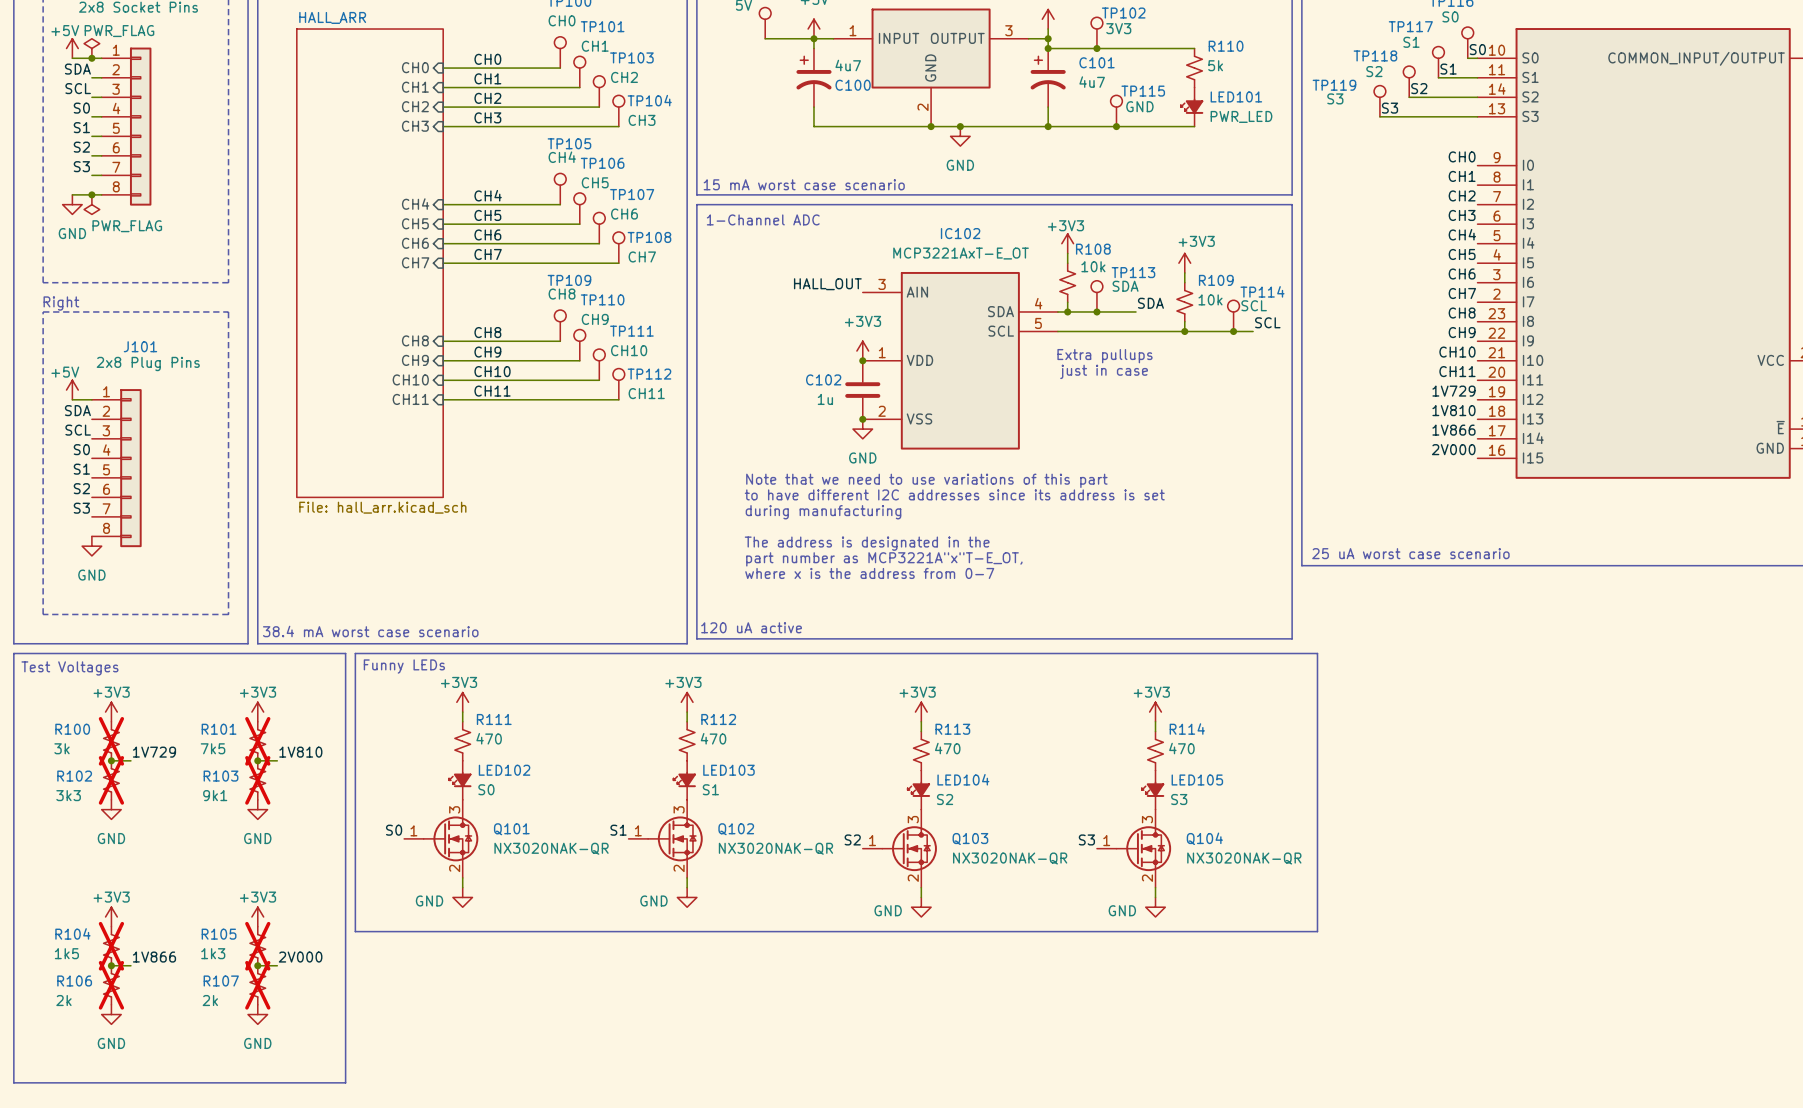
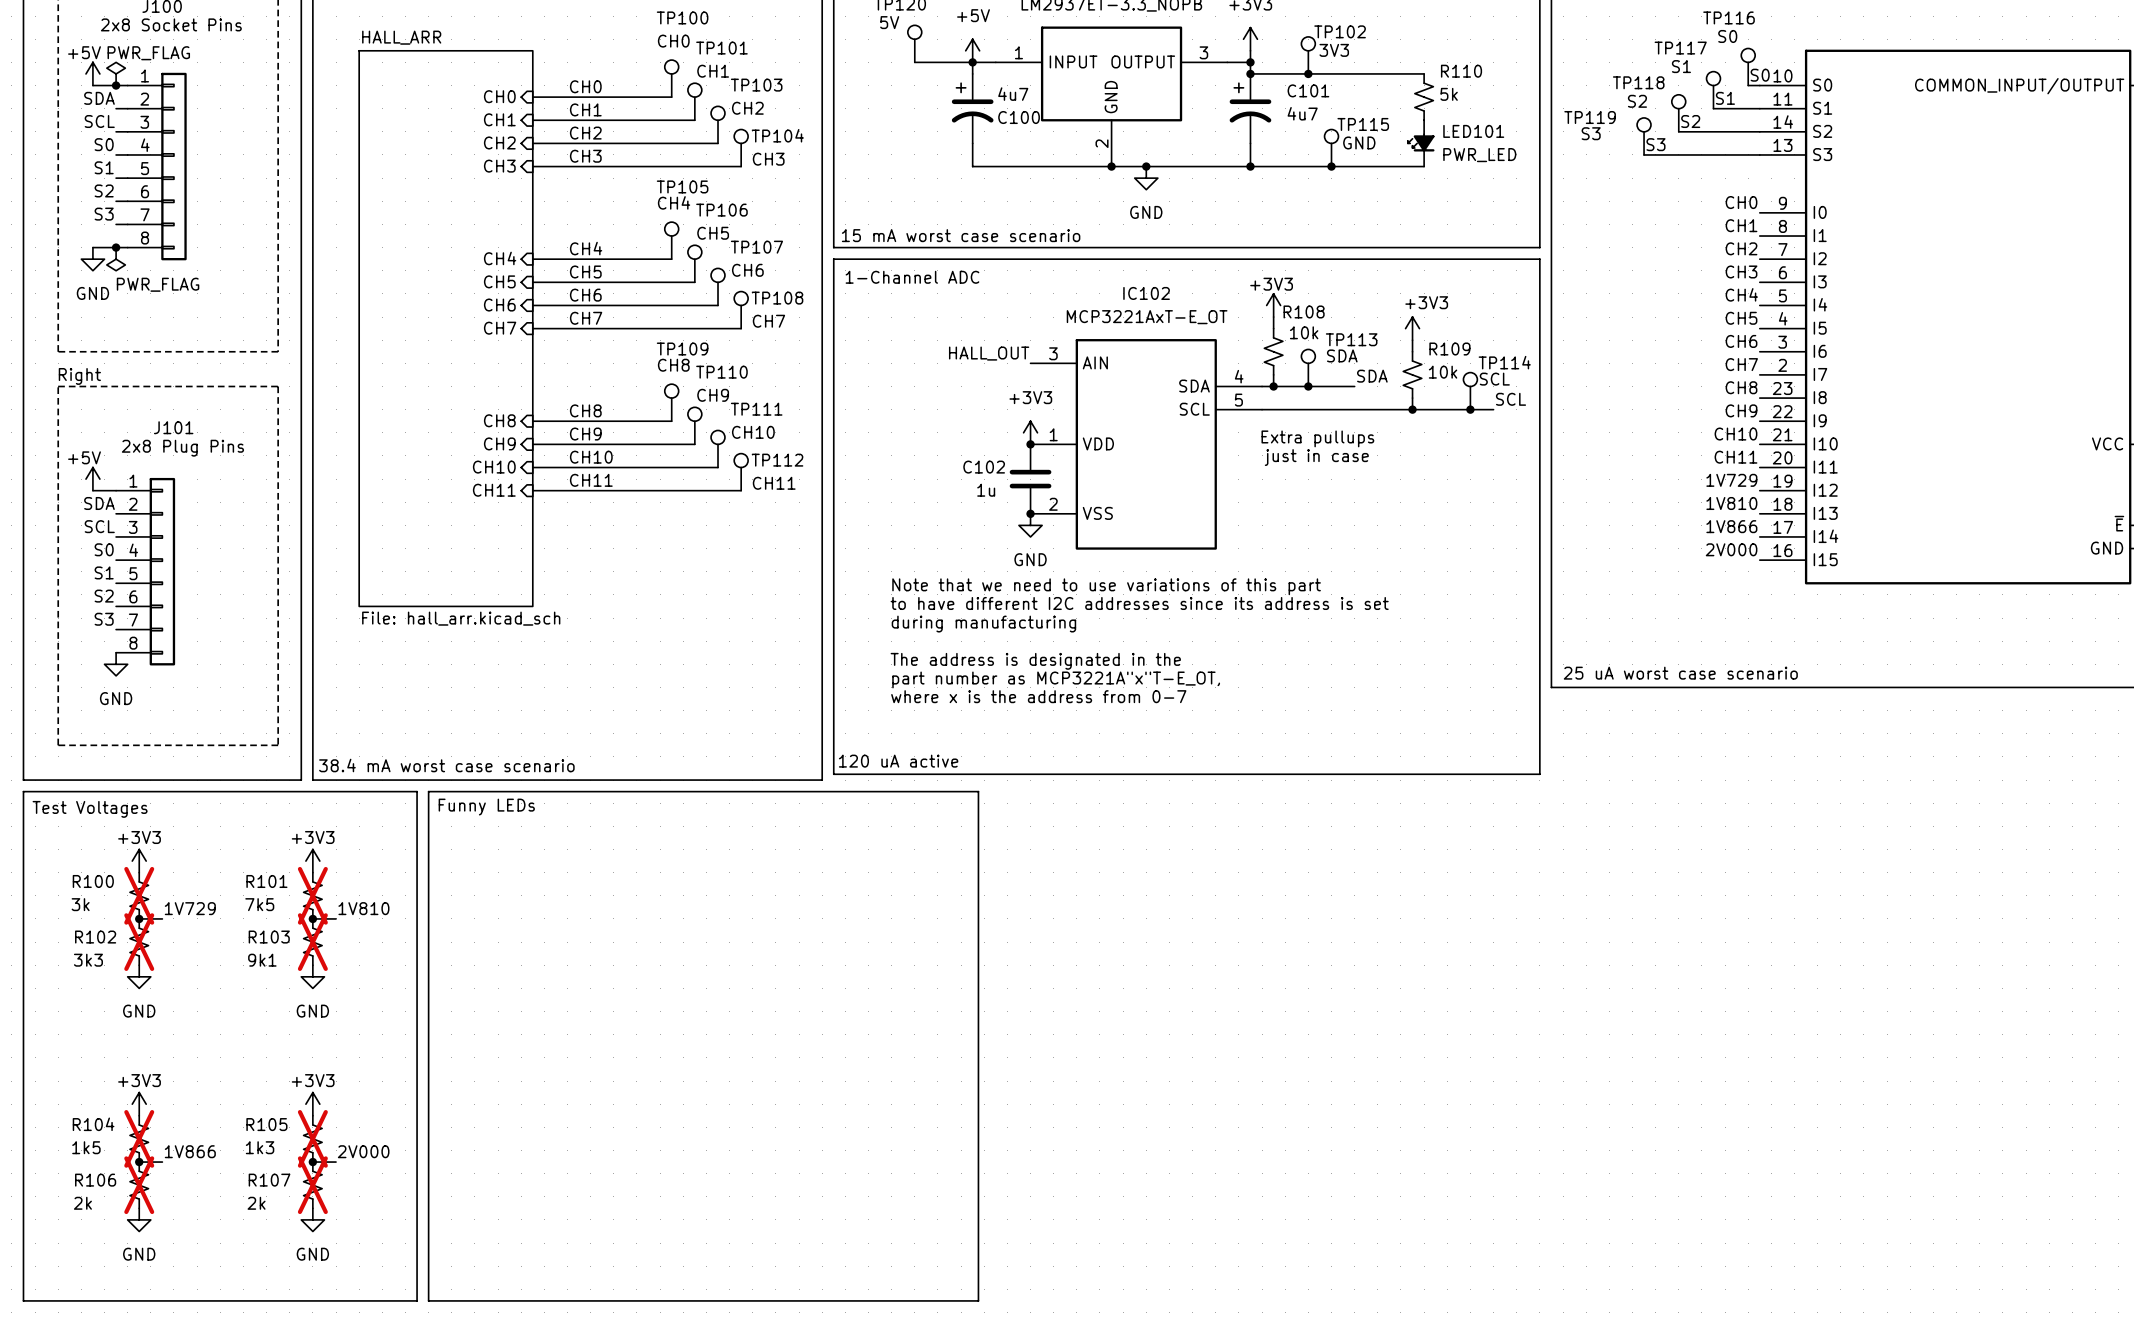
line: (818, 653) (1317, 653) (1317, 931) (355, 931) -> (978, 791) (978, 1300) (428, 1300) (428, 1121)
power symbol: +3V3 (462, 702) -> none
power symbol: +3V3 (687, 702) -> none
wire: (462, 712) (462, 721) -> none
wire: (687, 712) (687, 721) -> none
power symbol: +3V3 (921, 712) -> none
power symbol: +3V3 (1155, 712) -> none
wire: (921, 721) (921, 731) -> none
wire: (1155, 721) (1155, 731) -> none
R111: 470 (462, 741) -> none
R112: 470 (687, 741) -> none
R113: 470 (921, 751) -> none
R114: 470 (1155, 751) -> none
LED102: S0 (460, 780) -> none
LED103: S1 (684, 780) -> none
LED104: S2 (918, 790) -> none
LED105: S3 (1153, 790) -> none
label: S0 (394, 830) -> none
label: S1 (618, 830) -> none
Q101: NX3020NAK-QR (441, 838) -> none
Q102: NX3020NAK-QR (665, 838) -> none
label: S2 (852, 839) -> none
label: S3 (1086, 839) -> none
Q103: NX3020NAK-QR (899, 848) -> none
Q104: NX3020NAK-QR (1134, 848) -> none
wire: (462, 877) (462, 887) -> none
wire: (687, 877) (687, 887) -> none
wire: (921, 887) (921, 897) -> none
wire: (1155, 887) (1155, 897) -> none
power symbol: GND (462, 897) -> none
power symbol: GND (687, 897) -> none
power symbol: GND (921, 907) -> none
power symbol: GND (1155, 907) -> none

